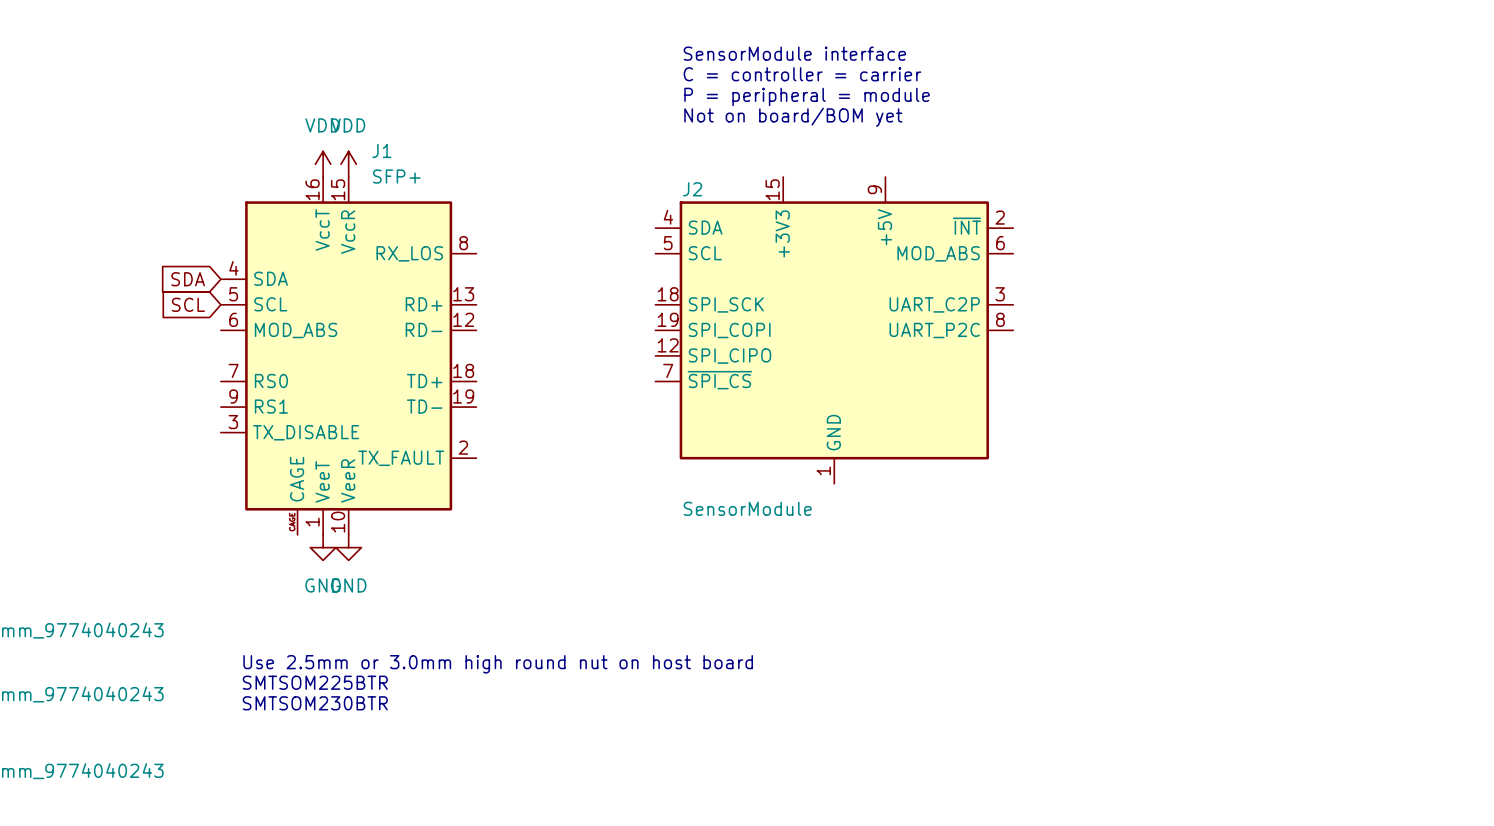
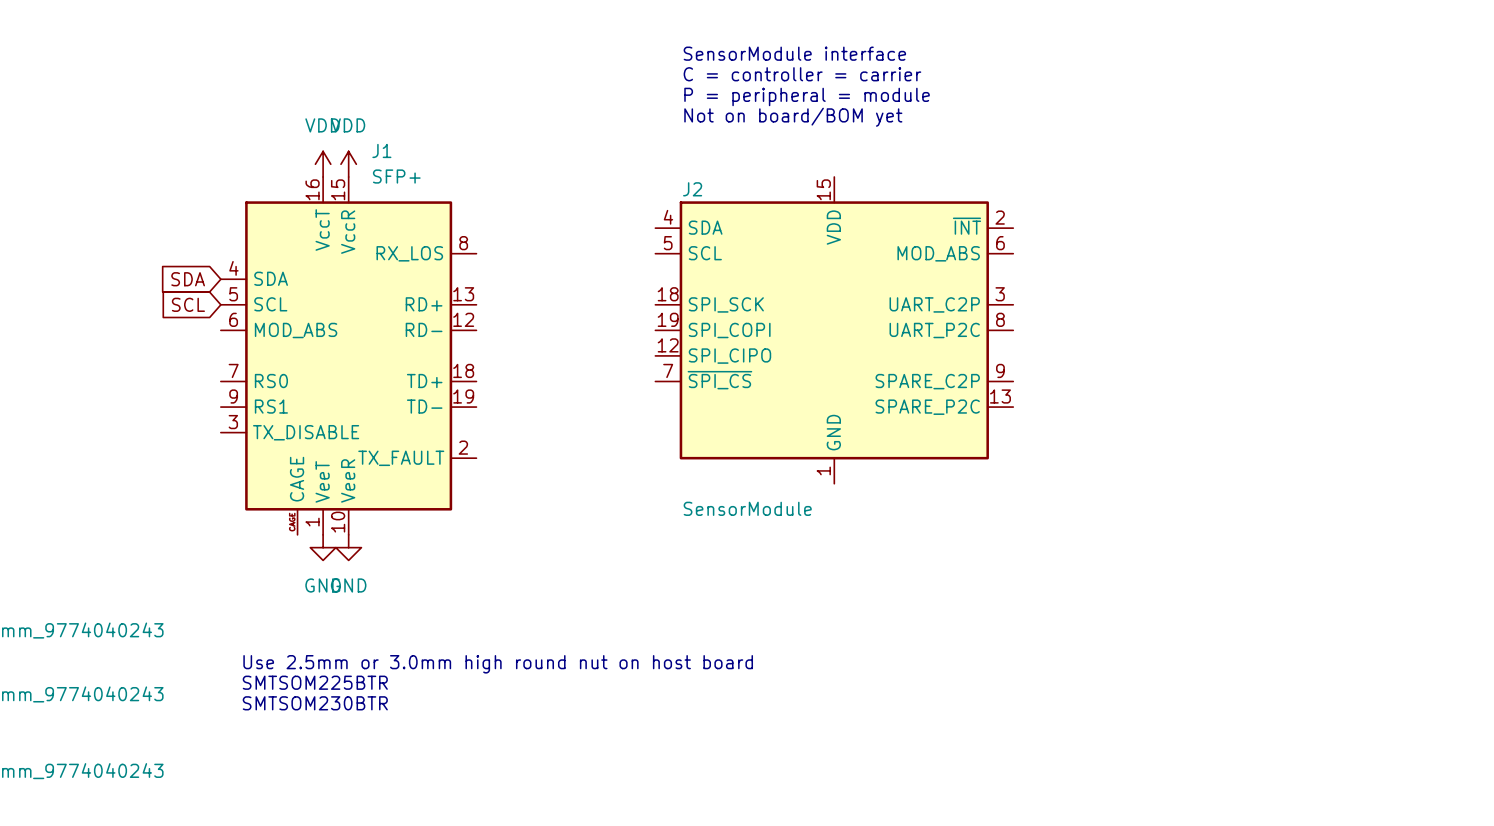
J2 symbol: [655, 177, 1014, 484] -> [655, 177, 1014, 484]

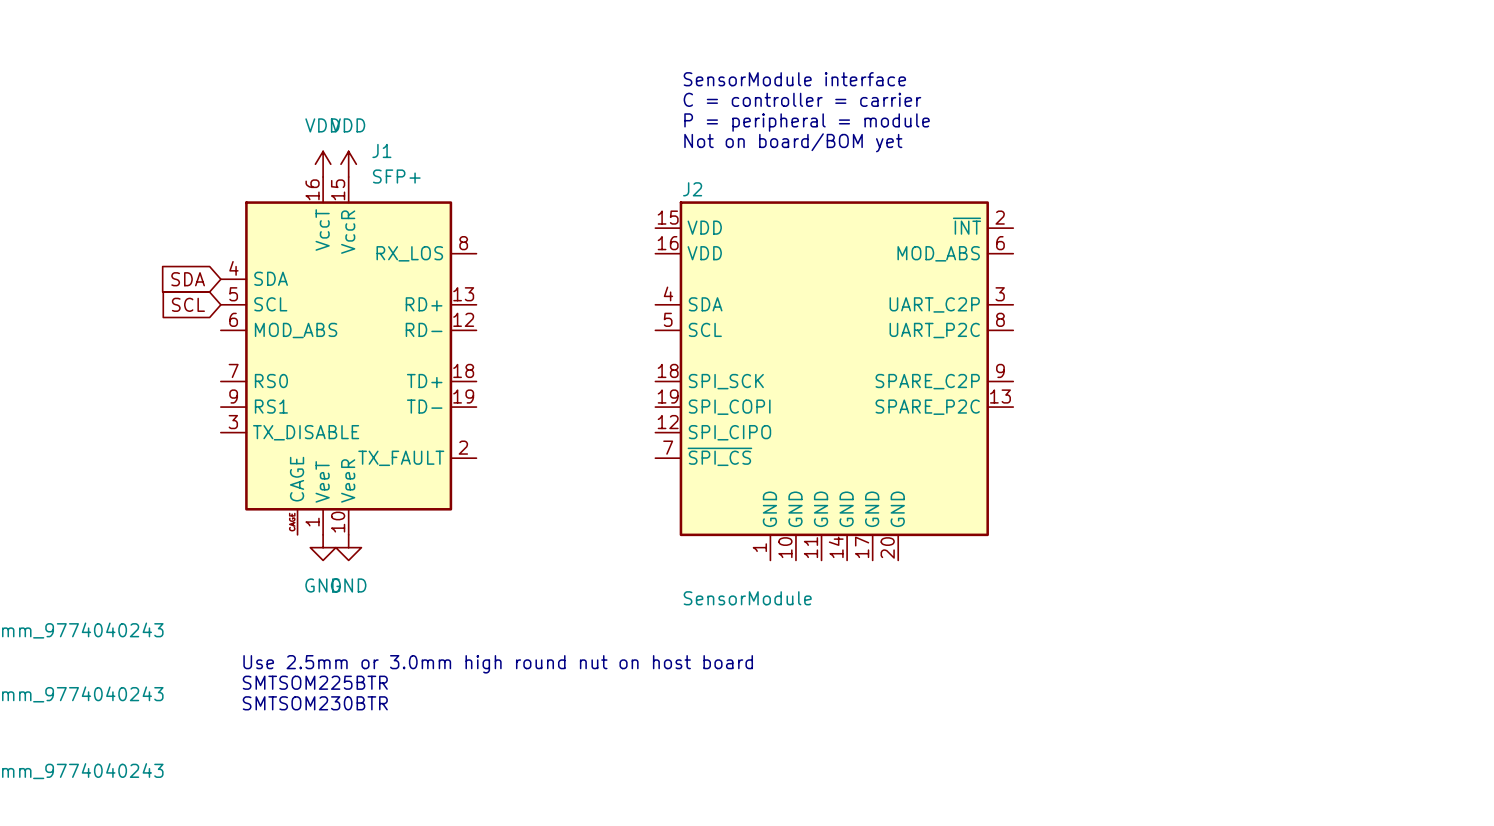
text: SensorModule interface (794, 53) -> none
text: C = controller = carrier (802, 74) -> SensorModule interface (794, 79)
text: P = peripheral = module (807, 96) -> C = controller = carrier (802, 99)
text: Not on board/BOM yet (793, 117) -> P = peripheral = module (807, 122)
text: none -> Not on board/BOM yet (793, 142)
J2 symbol: [655, 177, 1014, 484] -> [655, 201, 1014, 561]
J2 value position: SensorModule (747, 508) -> SensorModule (747, 598)

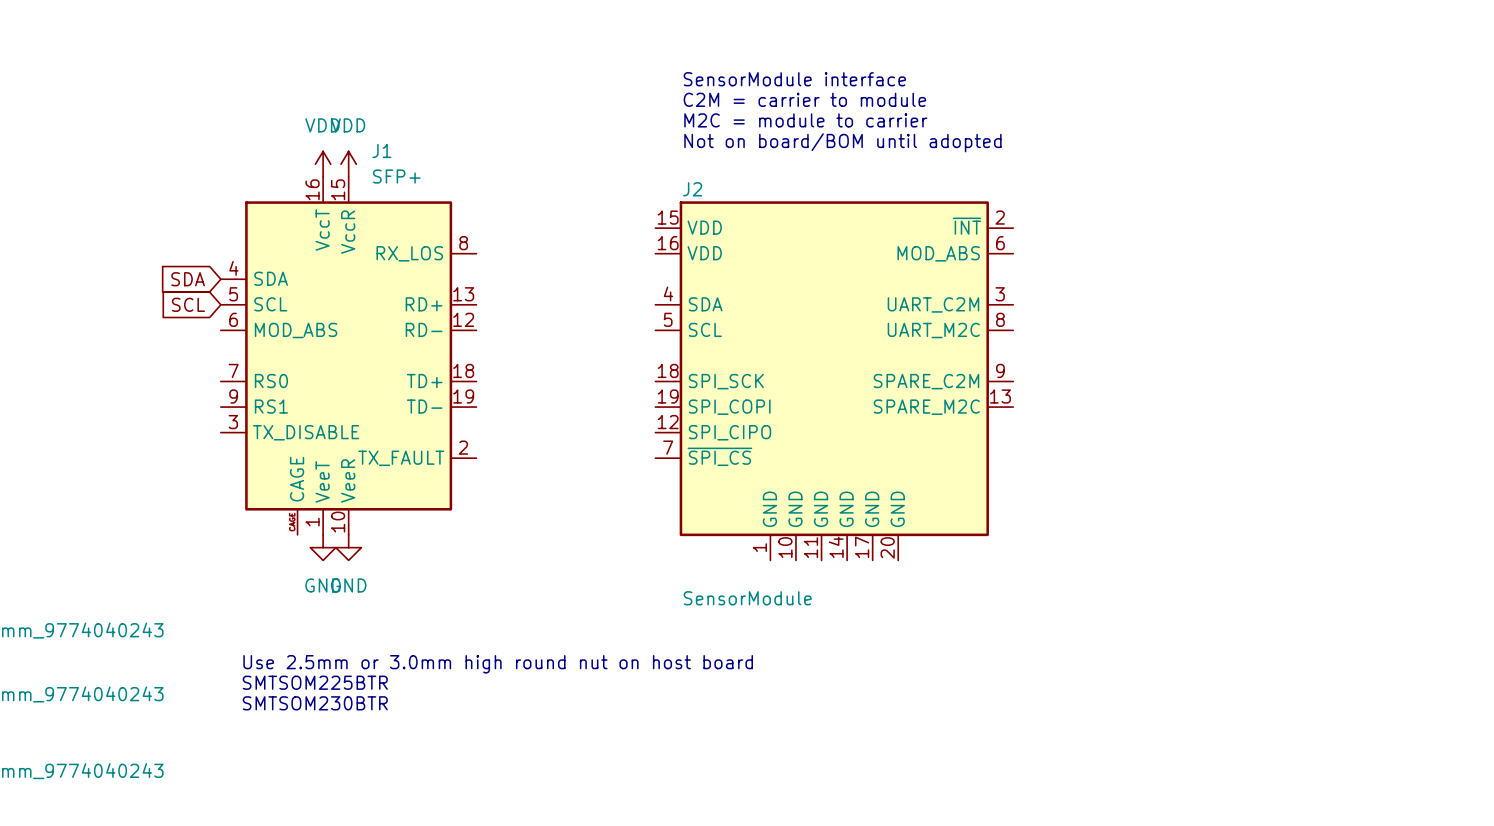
text: C = controller = carrier (802, 99) -> C2M = carrier to module (804, 99)
text: P = peripheral = module (807, 122) -> M2C = module to carrier (805, 120)
text: Not on board/BOM yet (793, 142) -> Not on board/BOM until adopted (842, 142)
J2 pin name: UART_C2P (934, 304) -> UART_C2M (933, 304)
J2 pin name: UART_P2C (934, 330) -> UART_M2C (933, 330)
J2 pin name: SPARE_C2P (927, 381) -> SPARE_C2M (926, 381)
J2 pin name: SPARE_P2C (927, 407) -> SPARE_M2C (926, 407)

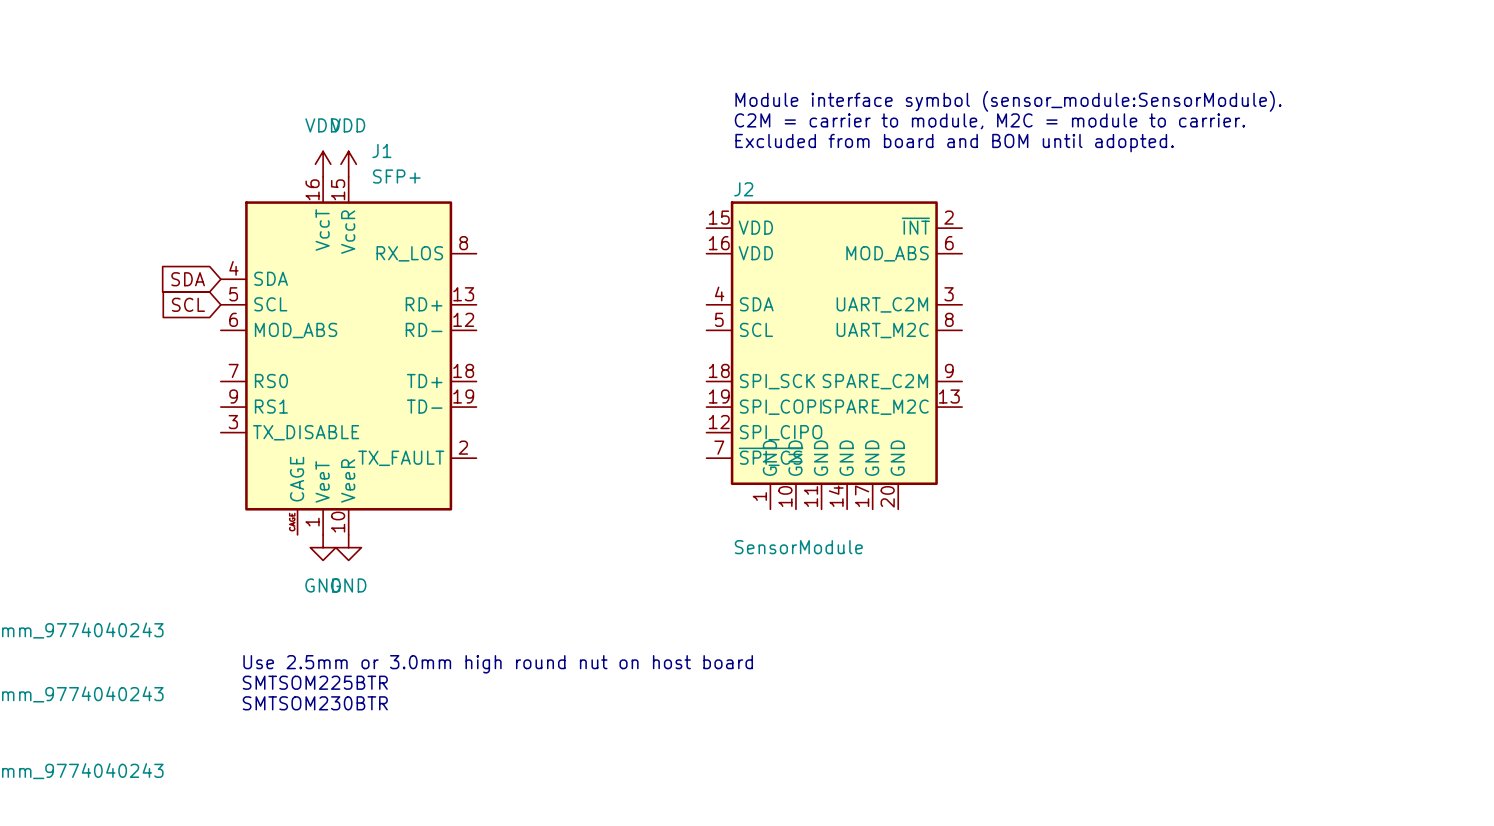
text: SensorModule interface (794, 79) -> none
text: C2M = carrier to module (804, 99) -> none
text: none -> Module interface symbol (sensor_module:SensorModule). (1008, 101)
text: M2C = module to carrier (805, 120) -> none
text: none -> C2M = carrier to module, M2C = module to carrier. (989, 121)
text: Not on board/BOM until adopted (842, 142) -> Excluded from board and BOM until adopted. (954, 143)
J2 name position: J2 (692, 189) -> J2 (743, 189)
J2 symbol: [655, 201, 1014, 561] -> [706, 201, 963, 510]
J2 value position: SensorModule (747, 598) -> SensorModule (798, 547)

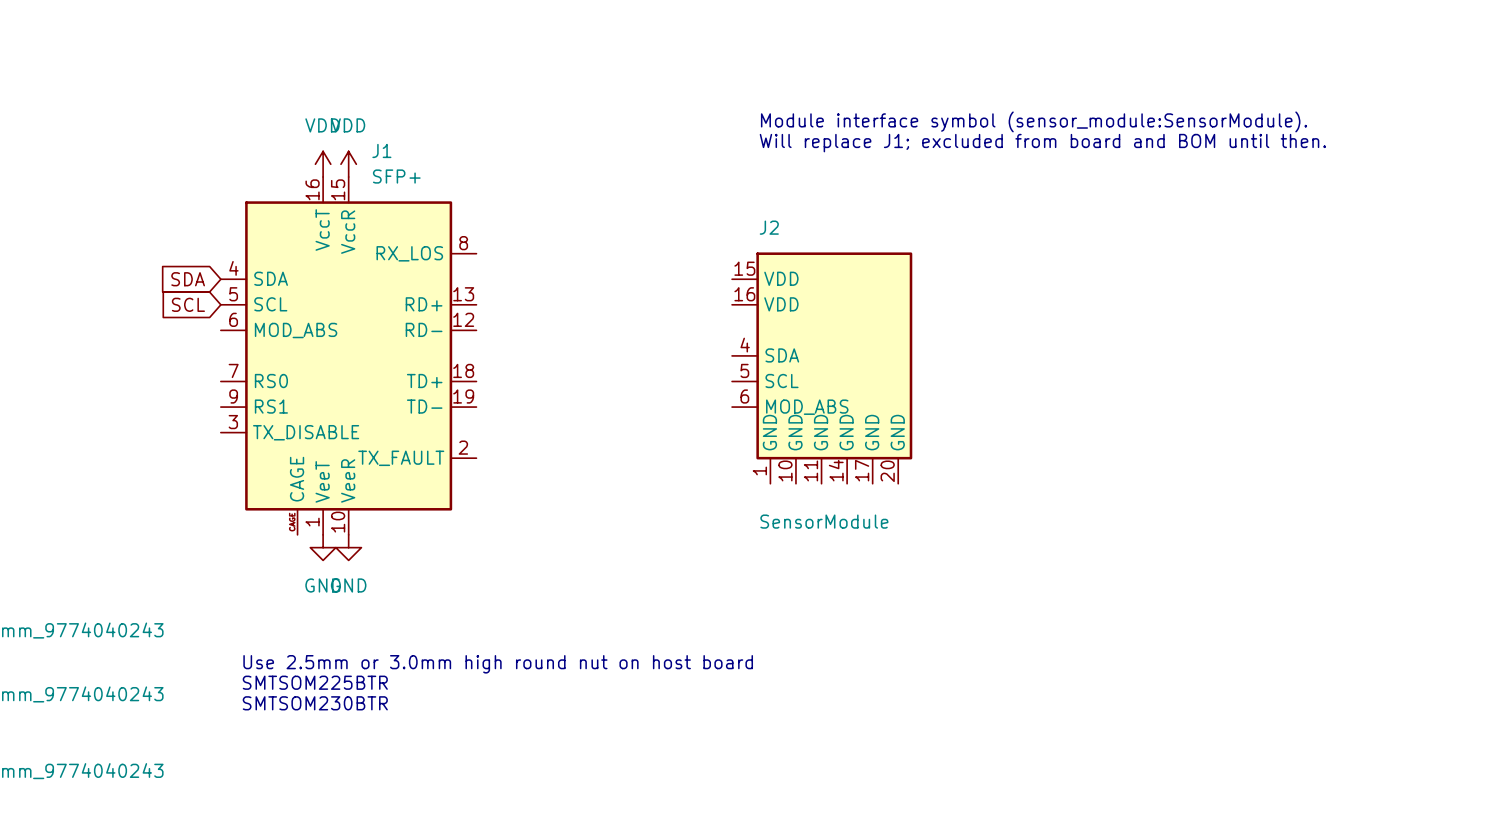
text position: Module interface symbol (sensor_module:SensorModule). (1008, 101) -> Module interface symbol (sensor_module:SensorModule). (1034, 121)
text: C2M = carrier to module, M2C = module to carrier. (989, 121) -> none
text: Excluded from board and BOM until adopted. (954, 143) -> Will replace J1; excluded from board and BOM until then. (1042, 143)
J2 name position: J2 (743, 189) -> J2 (769, 227)
J2 symbol: [706, 201, 963, 510] -> [732, 252, 913, 484]
J2 value position: SensorModule (798, 547) -> SensorModule (824, 521)

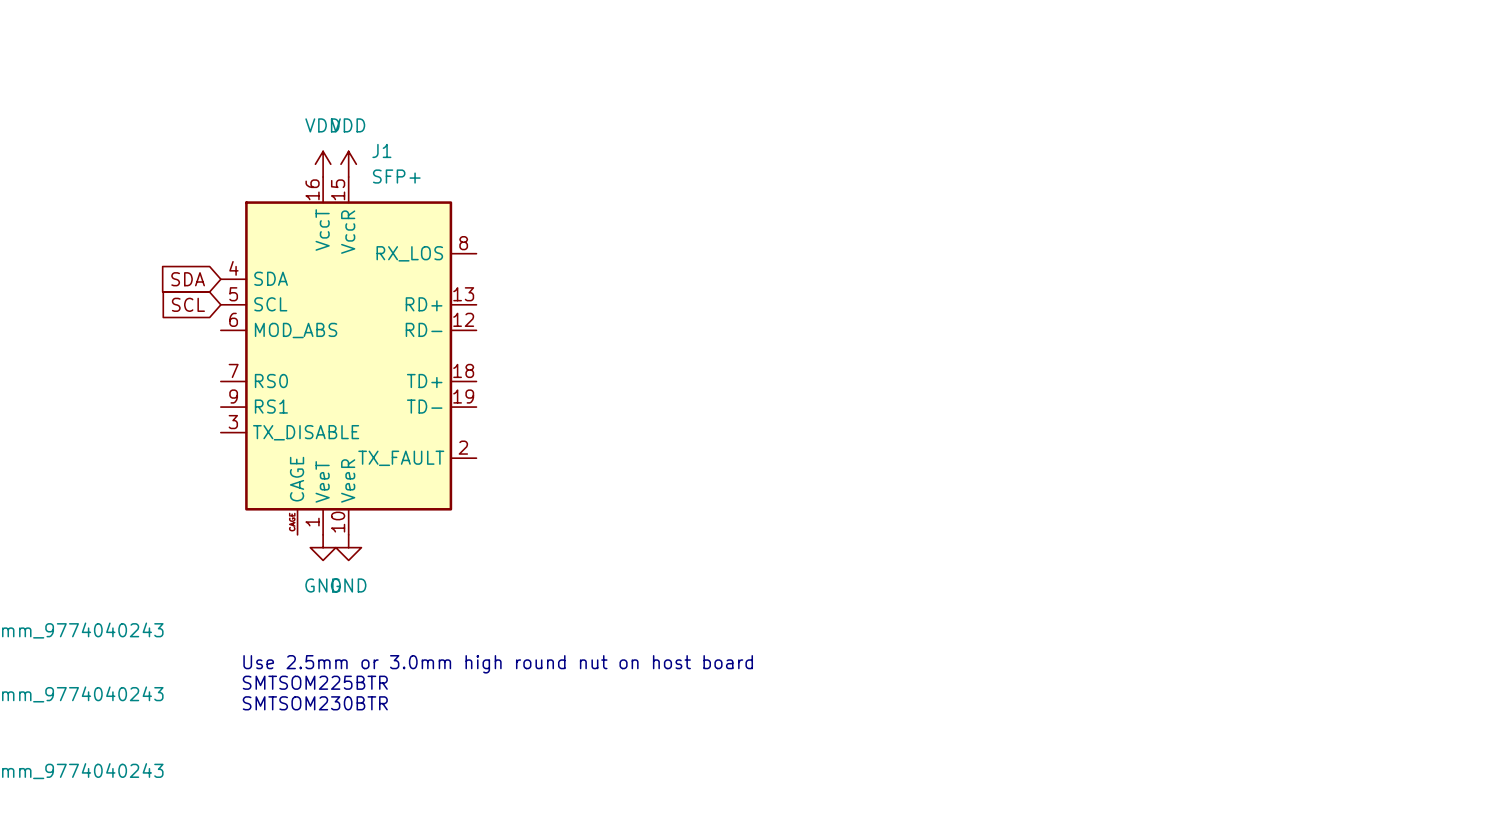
text: Module interface symbol (sensor_module:SensorModule). (1034, 121) -> none
text: Will replace J1; excluded from board and BOM until then. (1042, 143) -> none
J2: SensorModule (822, 368) -> none

